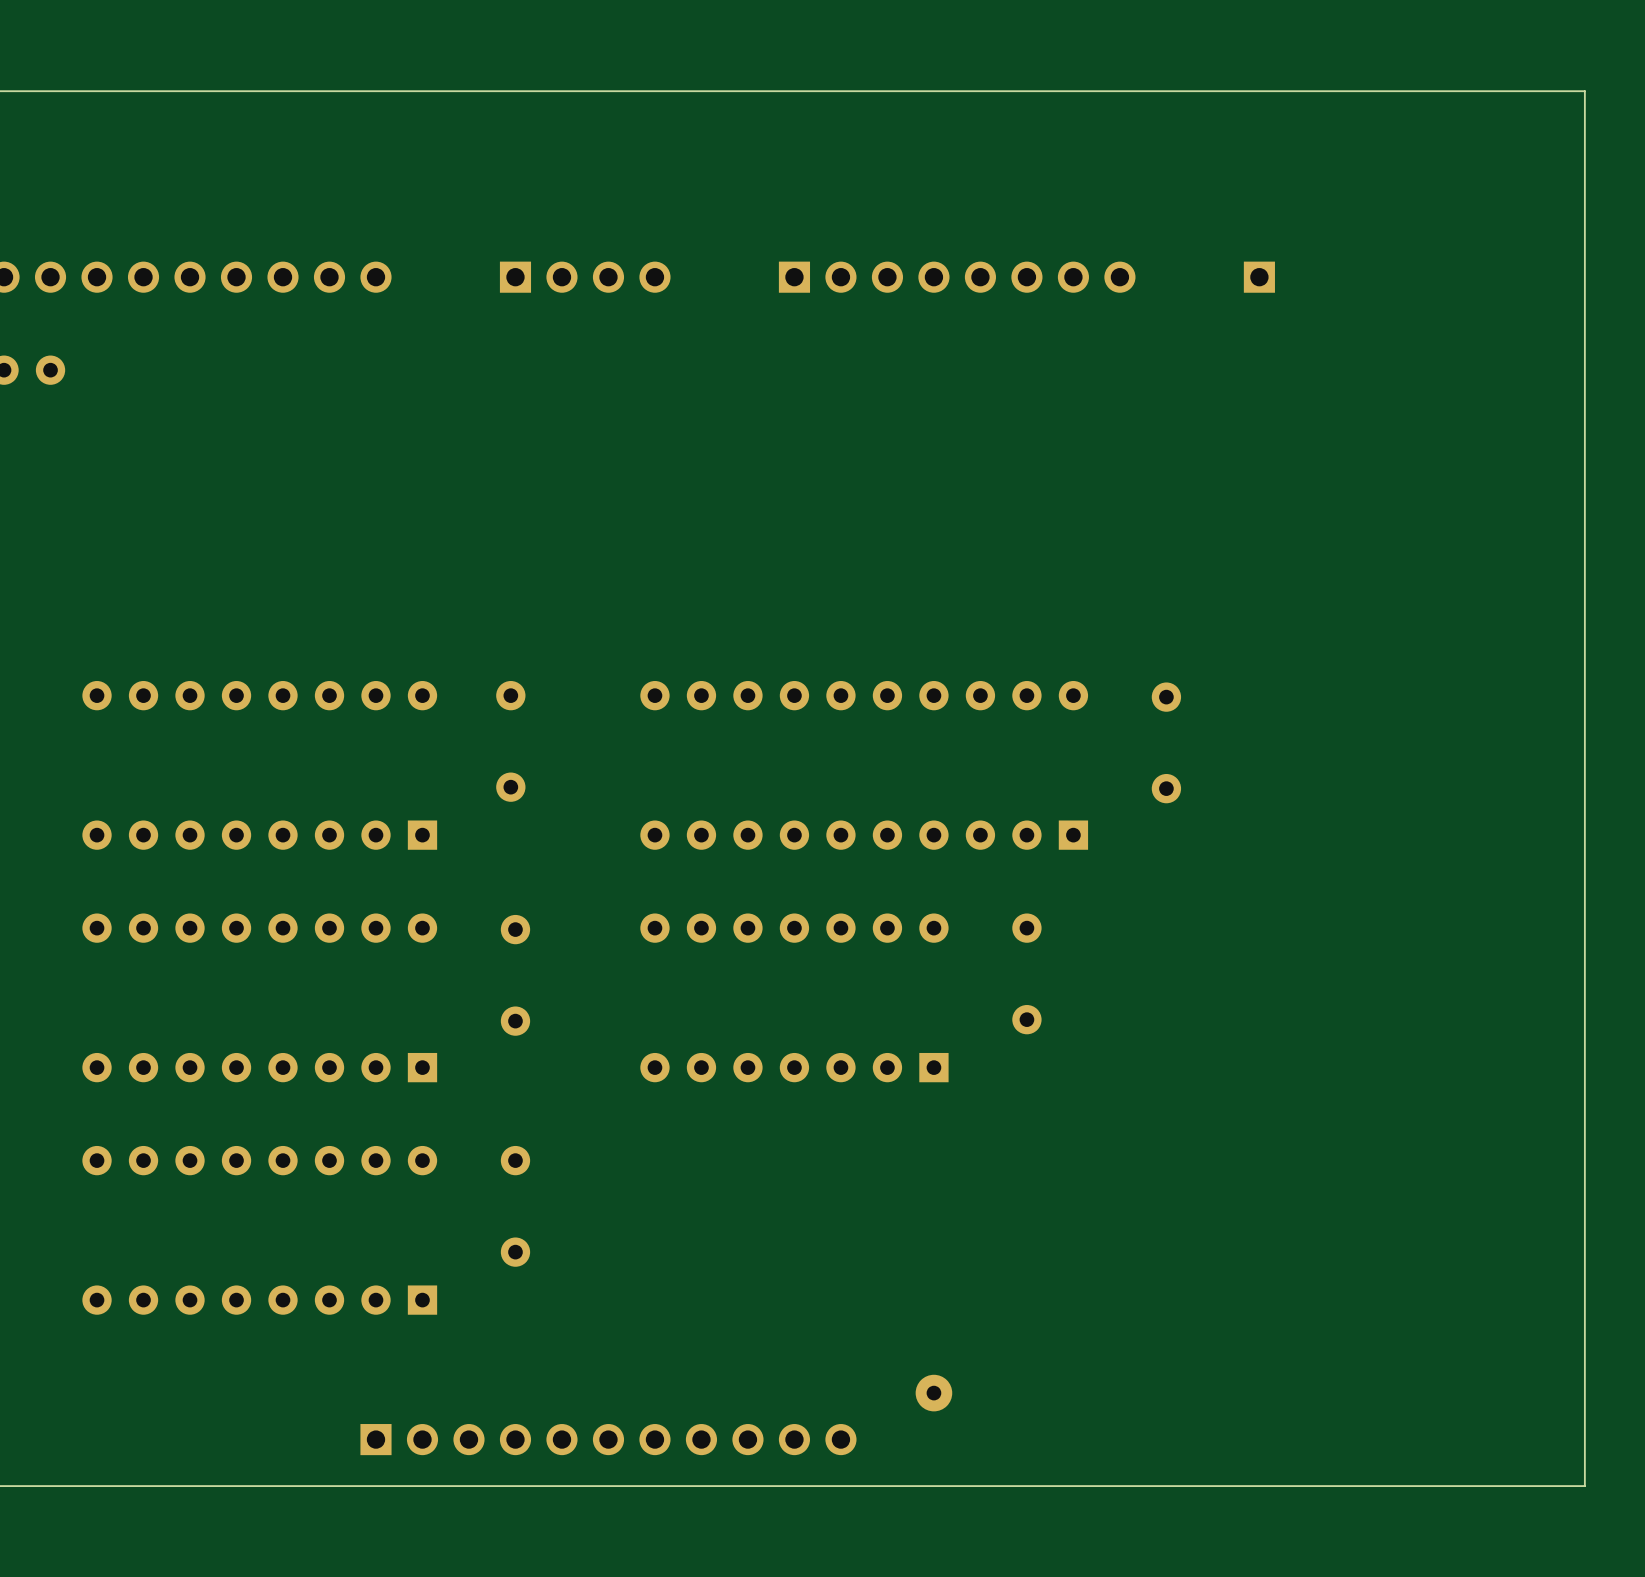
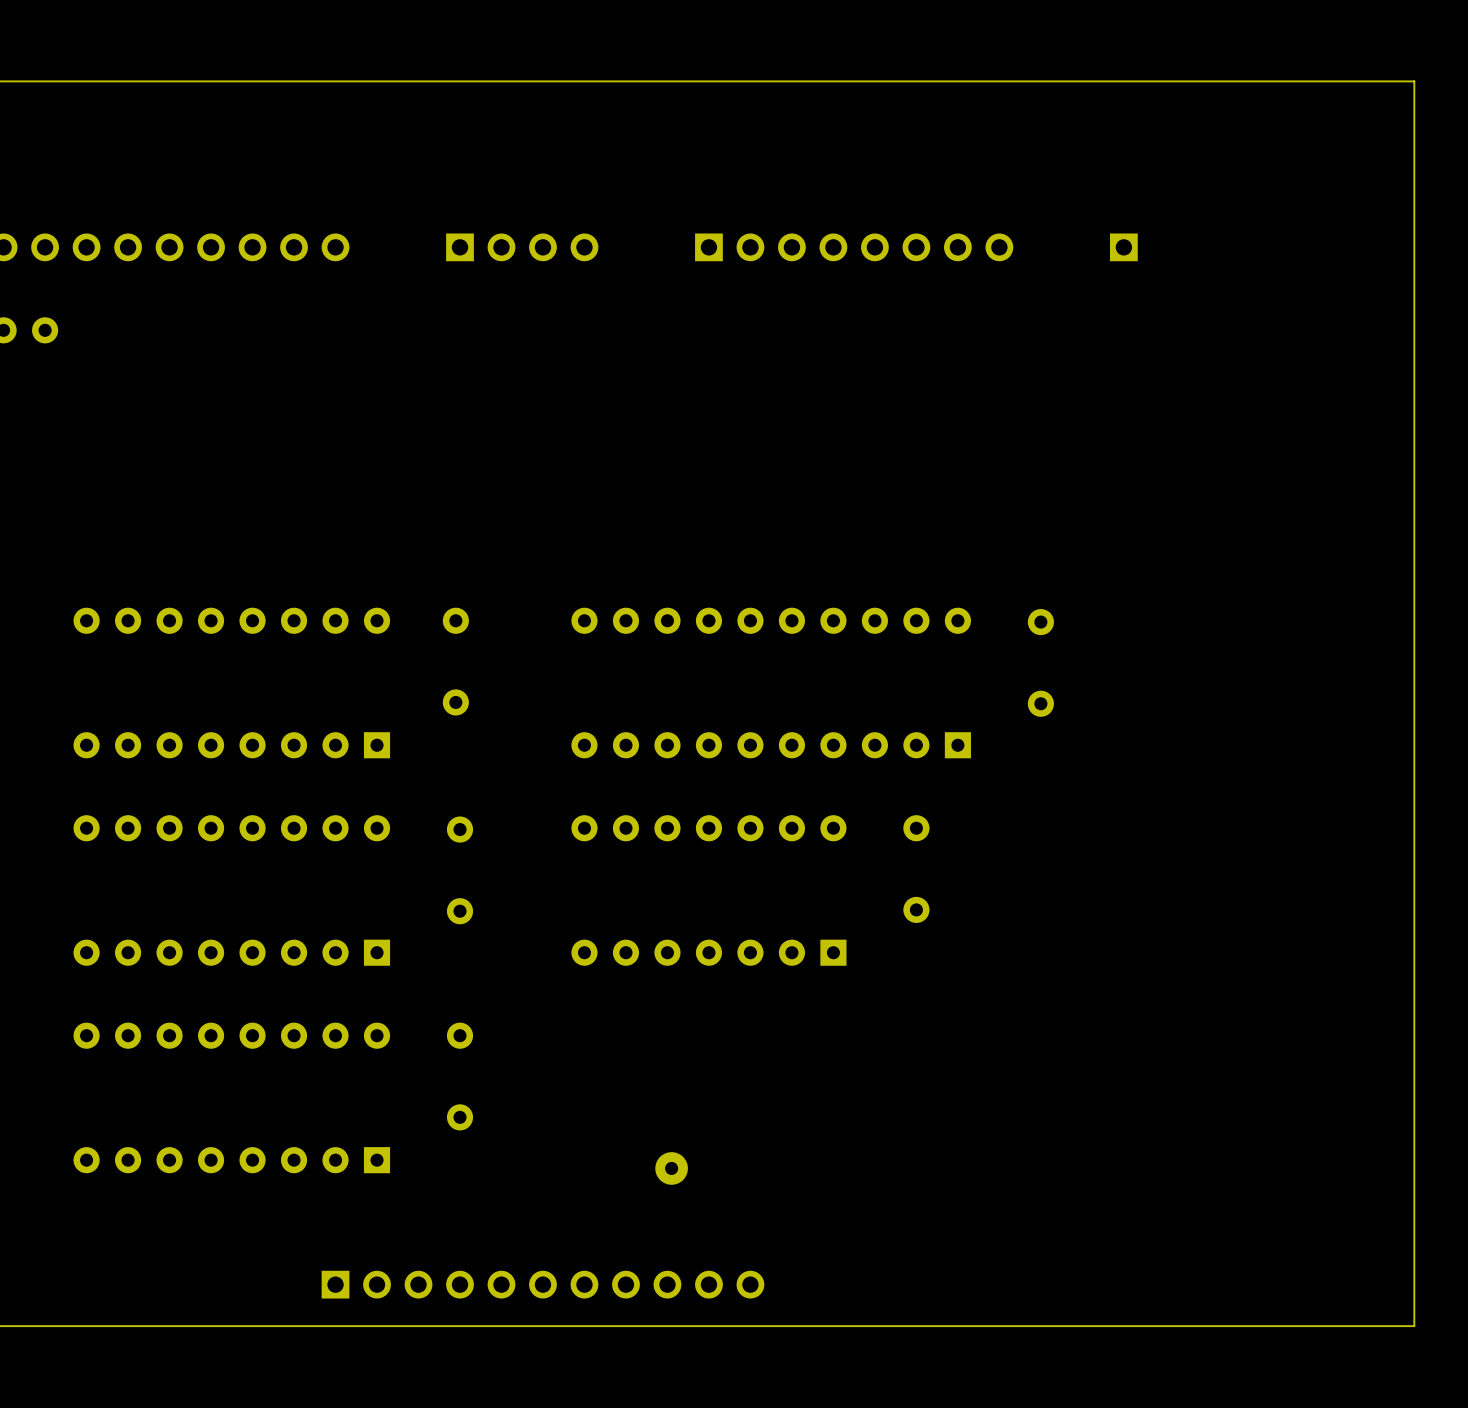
part position: (933, 1393) -> (671, 1168)

